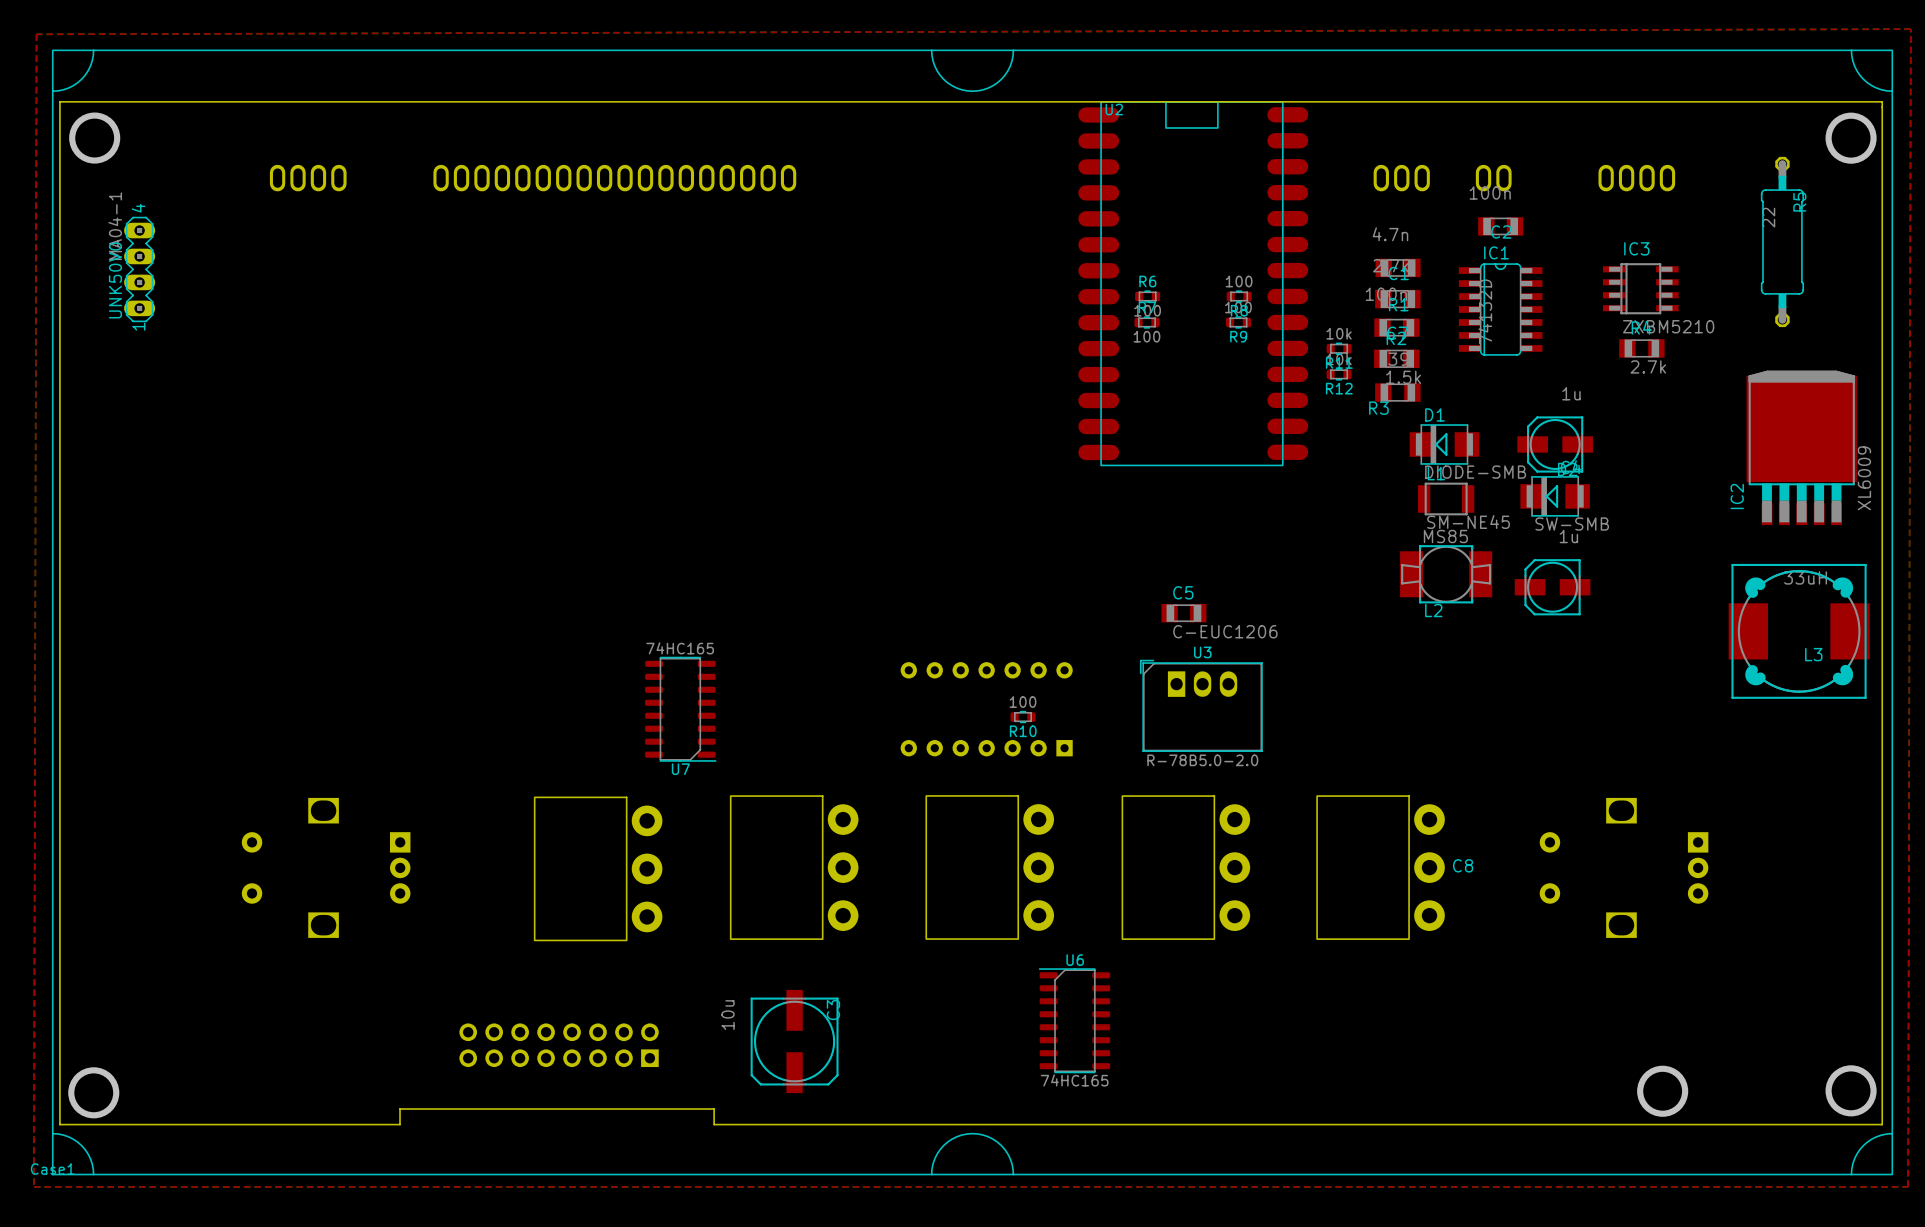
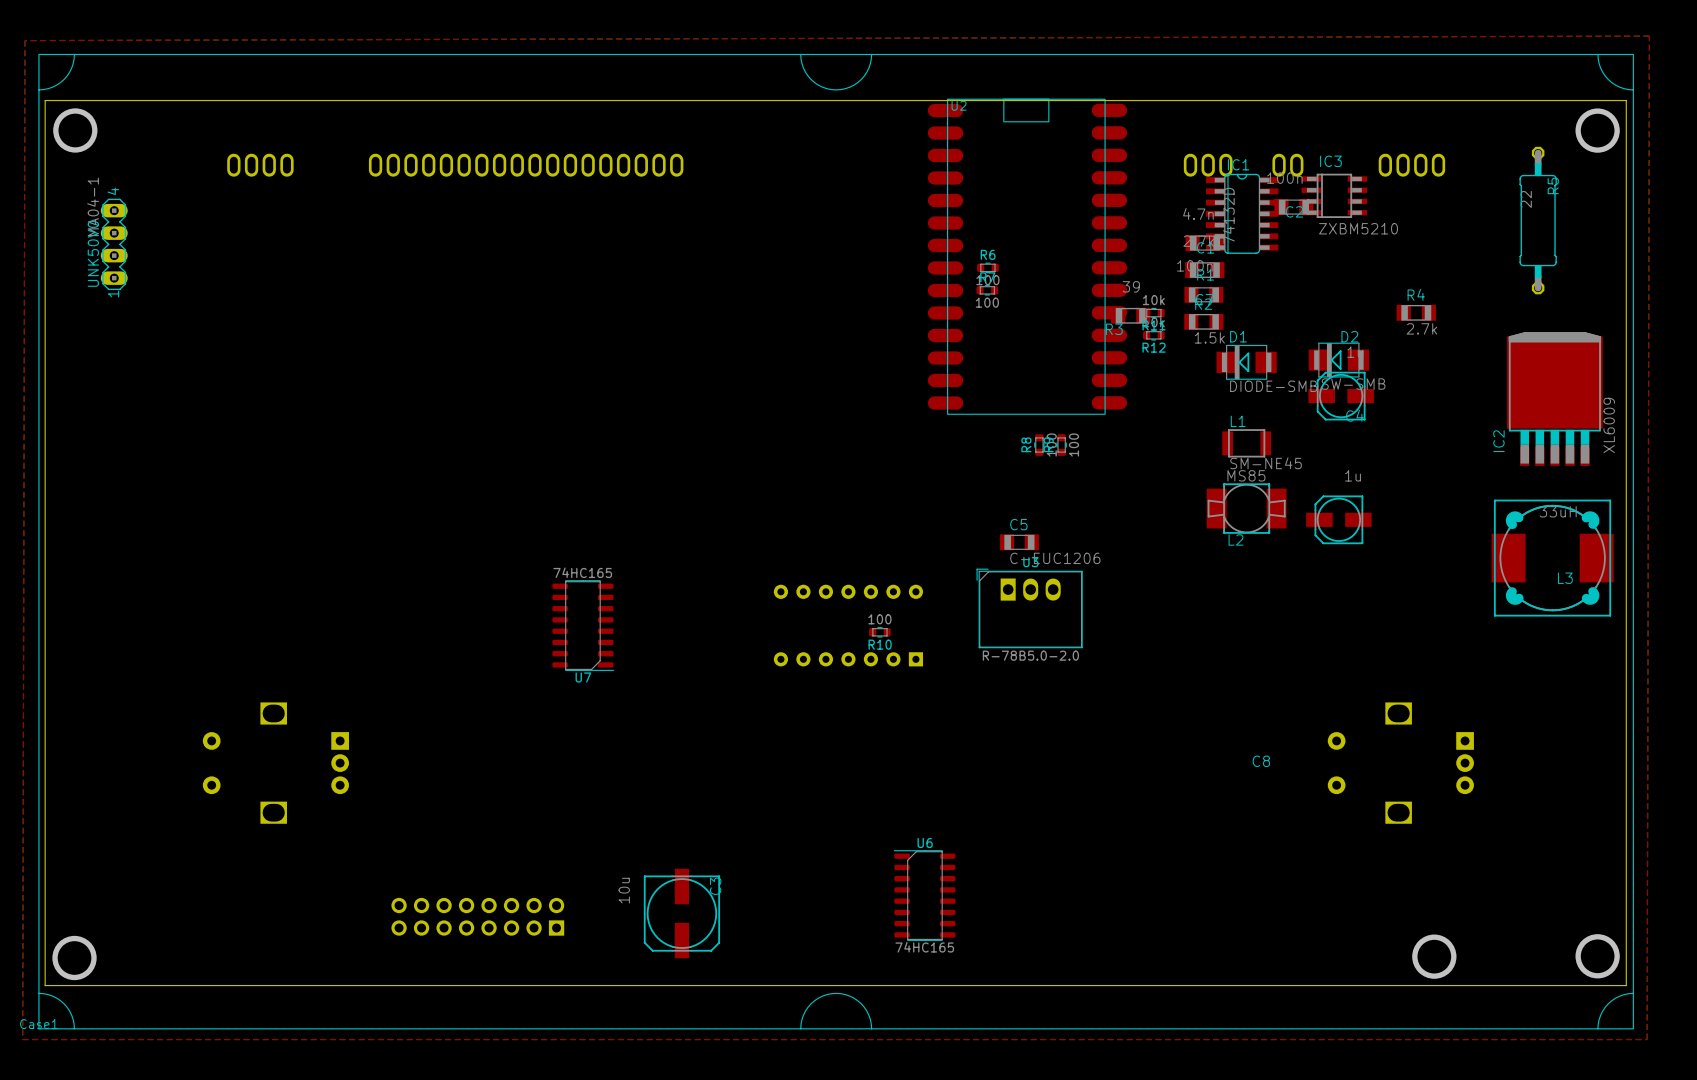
board edge: (59, 101) (1882, 101) (1882, 1124) (714, 1124) (714, 1109) (400, 1109) (400, 1124) (59, 1124) (59, 101) -> (45, 100) (45, 985) (1626, 985) (1626, 100) (45, 100)
IC3 position: (1640, 288) -> (1334, 195)
R8 rotation: 0° (1239, 296) -> 90° clockwise (1039, 445)
R8 position: (1239, 296) -> (1039, 445)
IC1 position: (1500, 309) -> (1242, 213)
R9 rotation: 0° (1238, 322) -> 90° clockwise (1061, 445)
R9 position: (1238, 322) -> (1061, 445)
R3 position: (1397, 392) -> (1130, 315)
D1 position: (1444, 444) -> (1246, 362)
D2 position: (1555, 496) -> (1338, 360)
U3 position: (1201, 705) -> (1029, 608)
part: (794, 867) -> none
part: (990, 867) -> none
part: (1186, 867) -> none
part: (1380, 867) -> none
part: (598, 868) -> none

